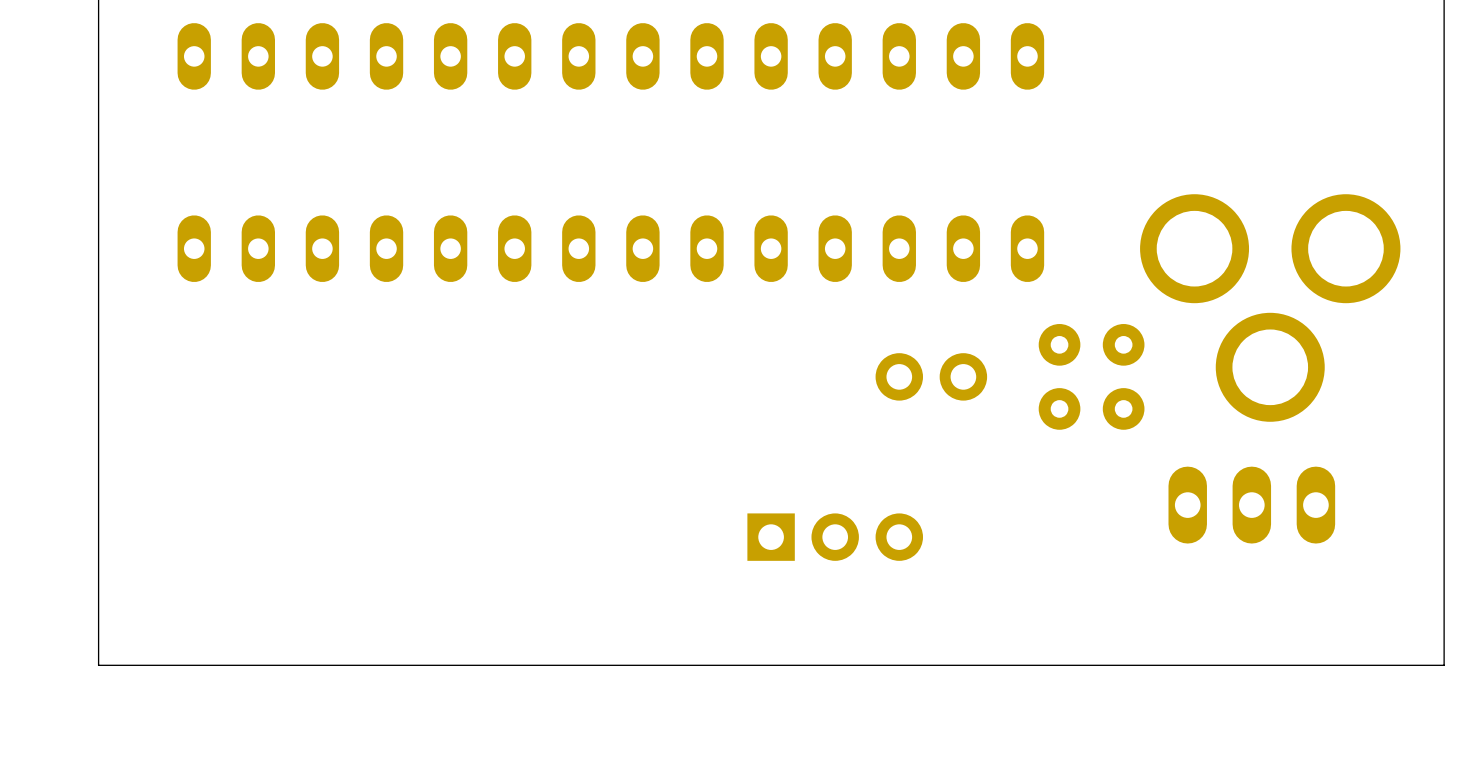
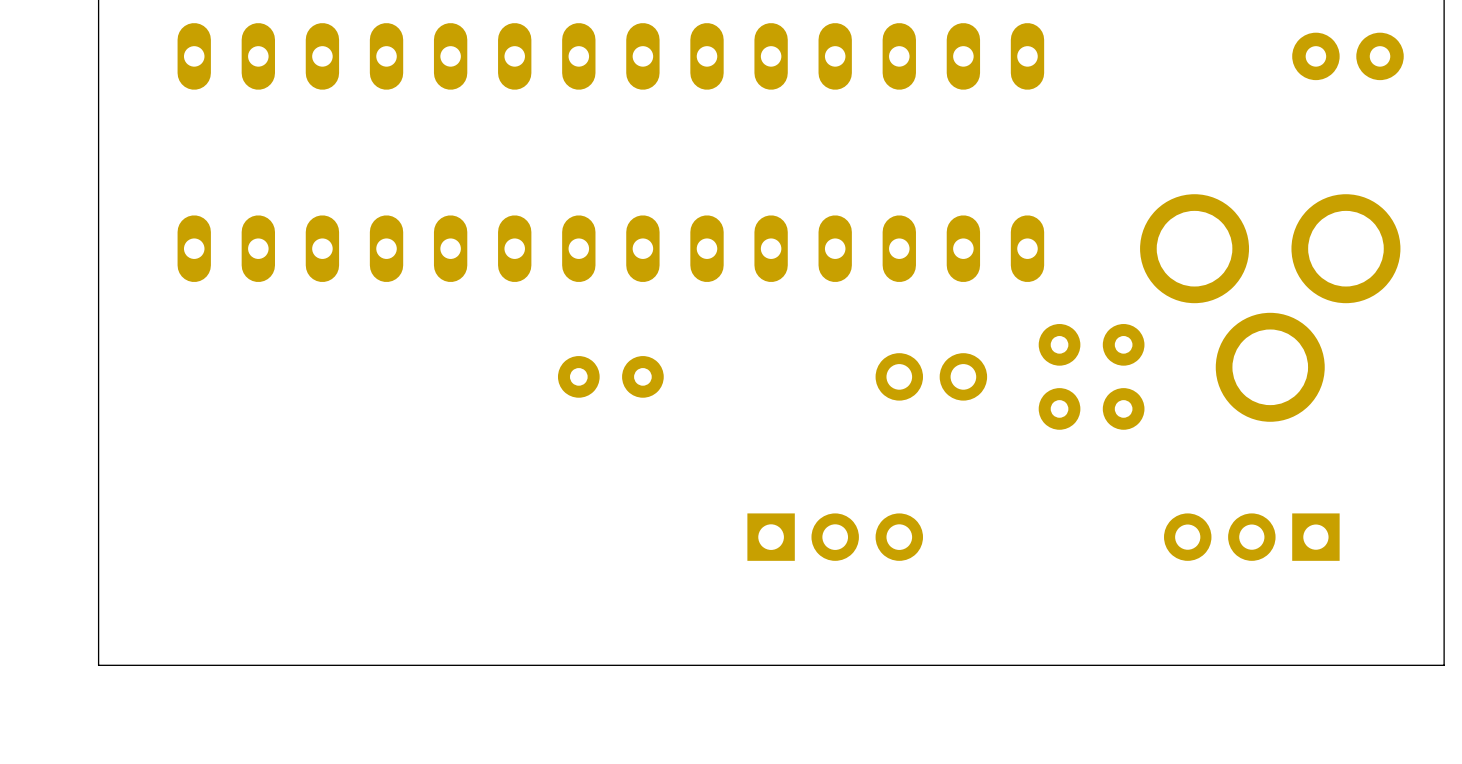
part: none -> (1347, 56)
part: none -> (610, 376)
part: (1251, 505) -> none
part: none -> (1251, 537)

